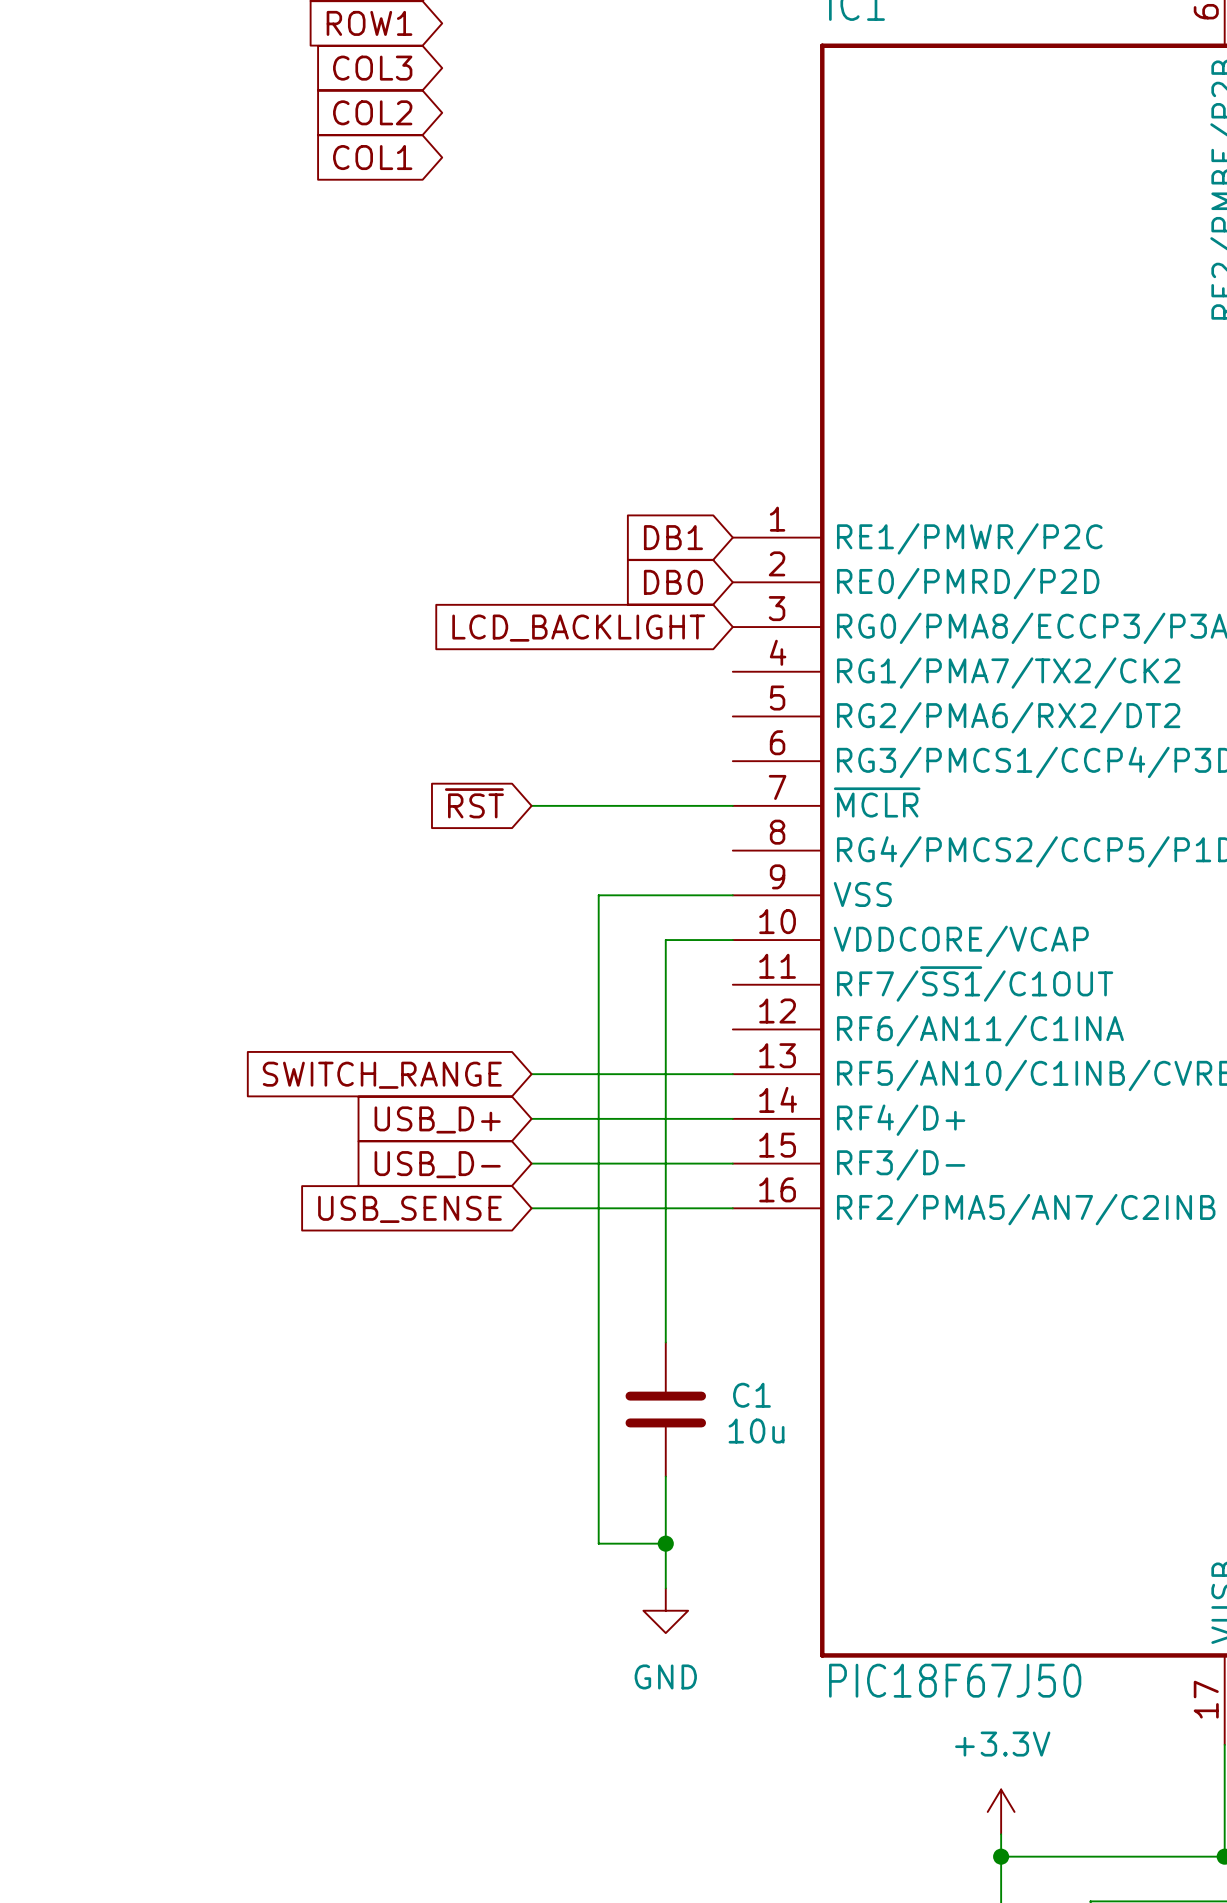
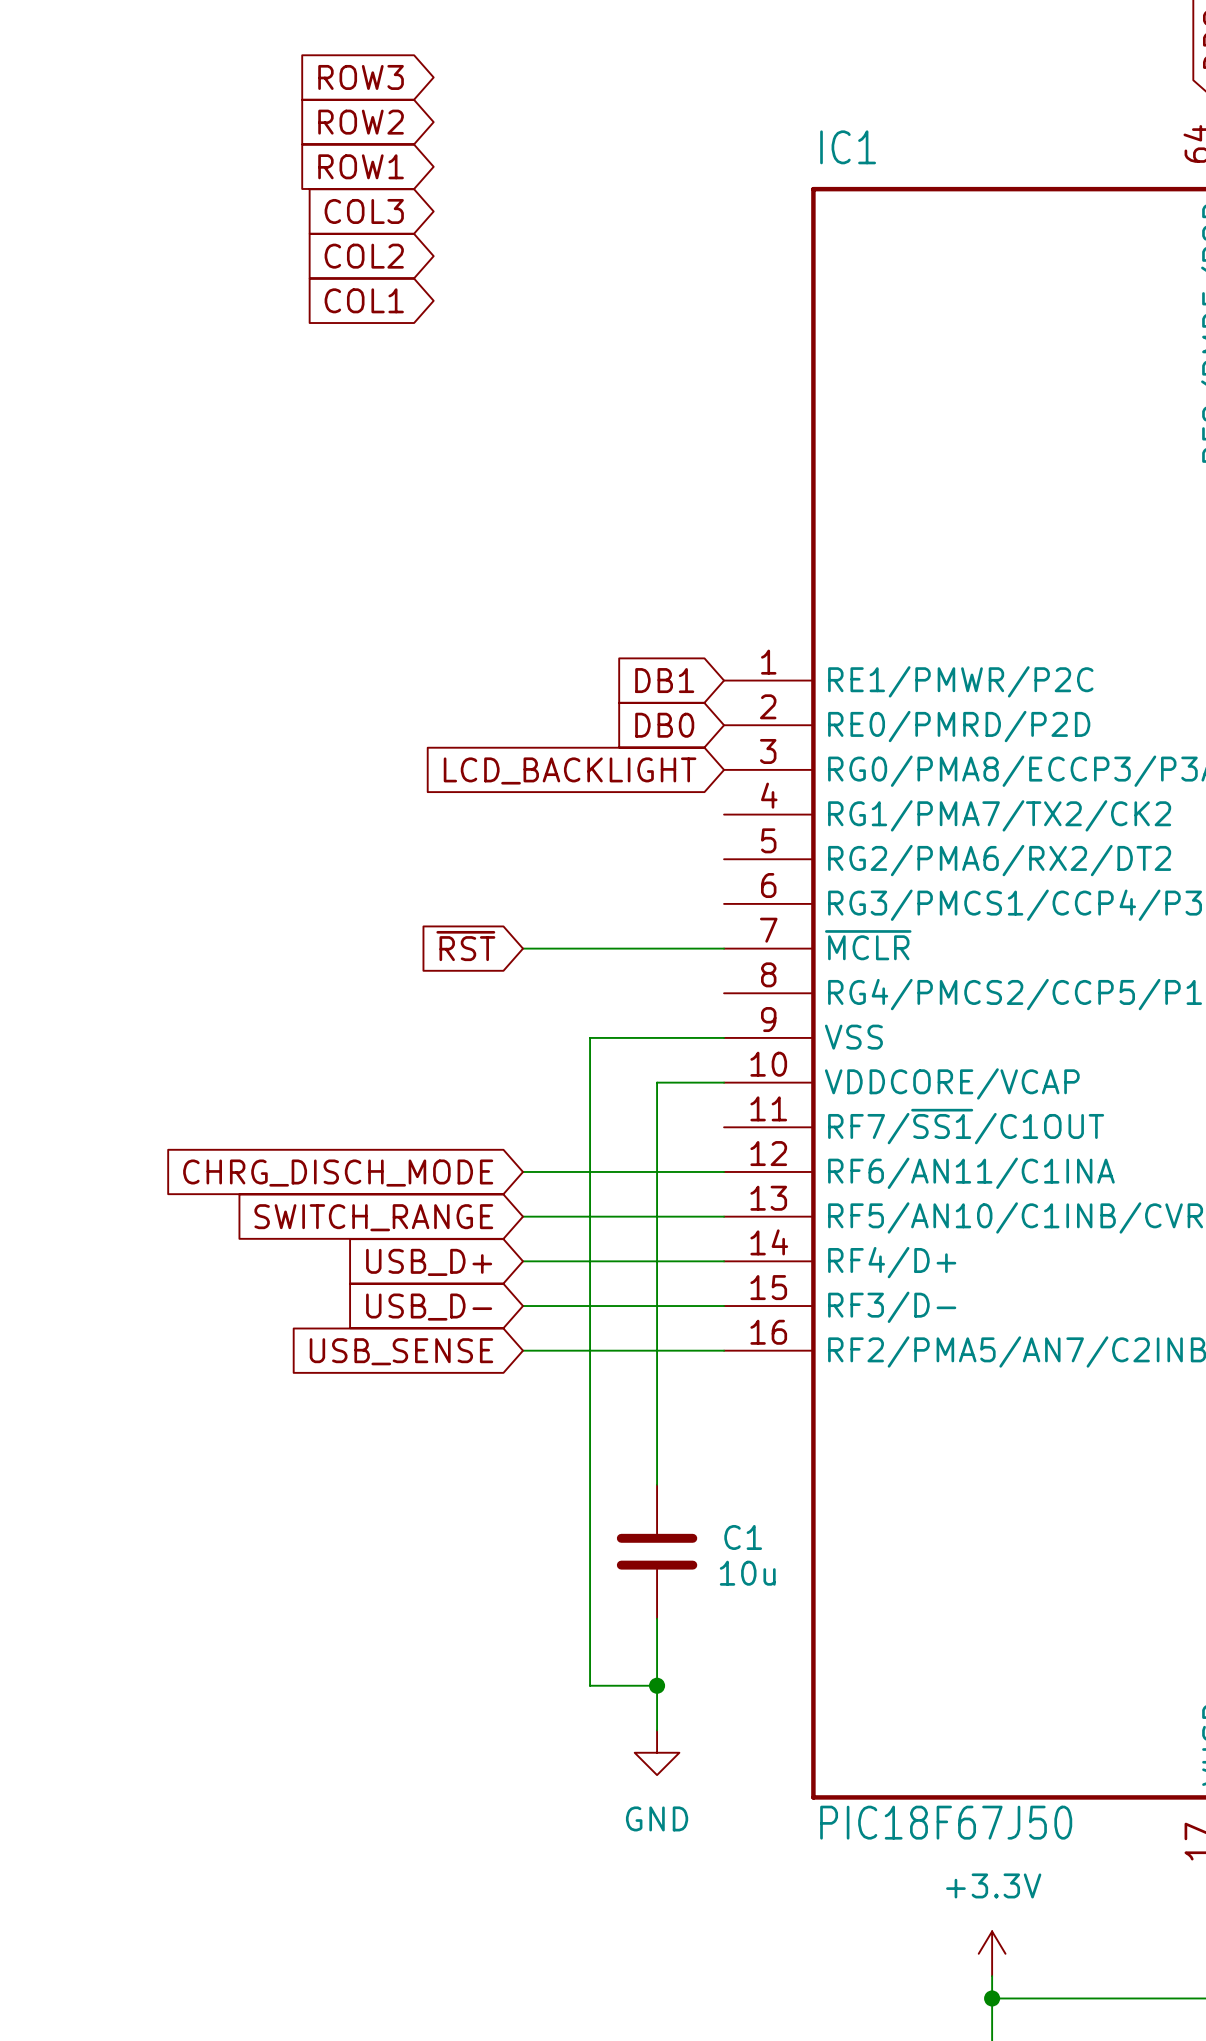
wire: none -> (523, 1171) (724, 1171)
global label: none -> CHRG_DISCH_MODE (338, 1173)

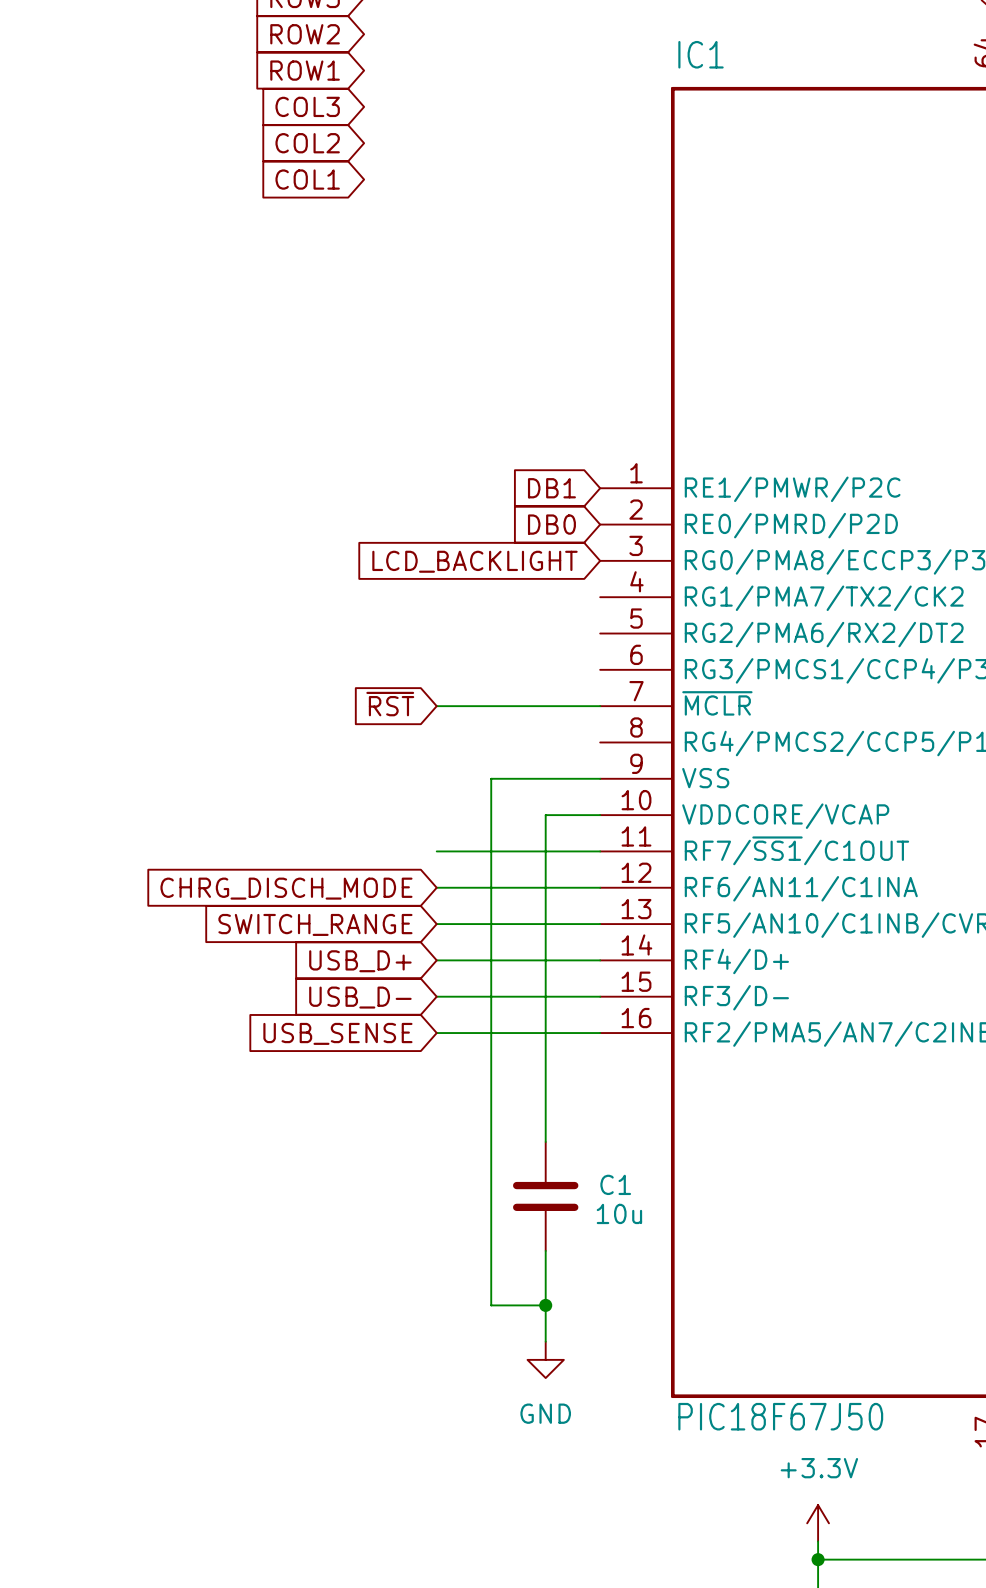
wire: none -> (436, 851) (600, 851)

